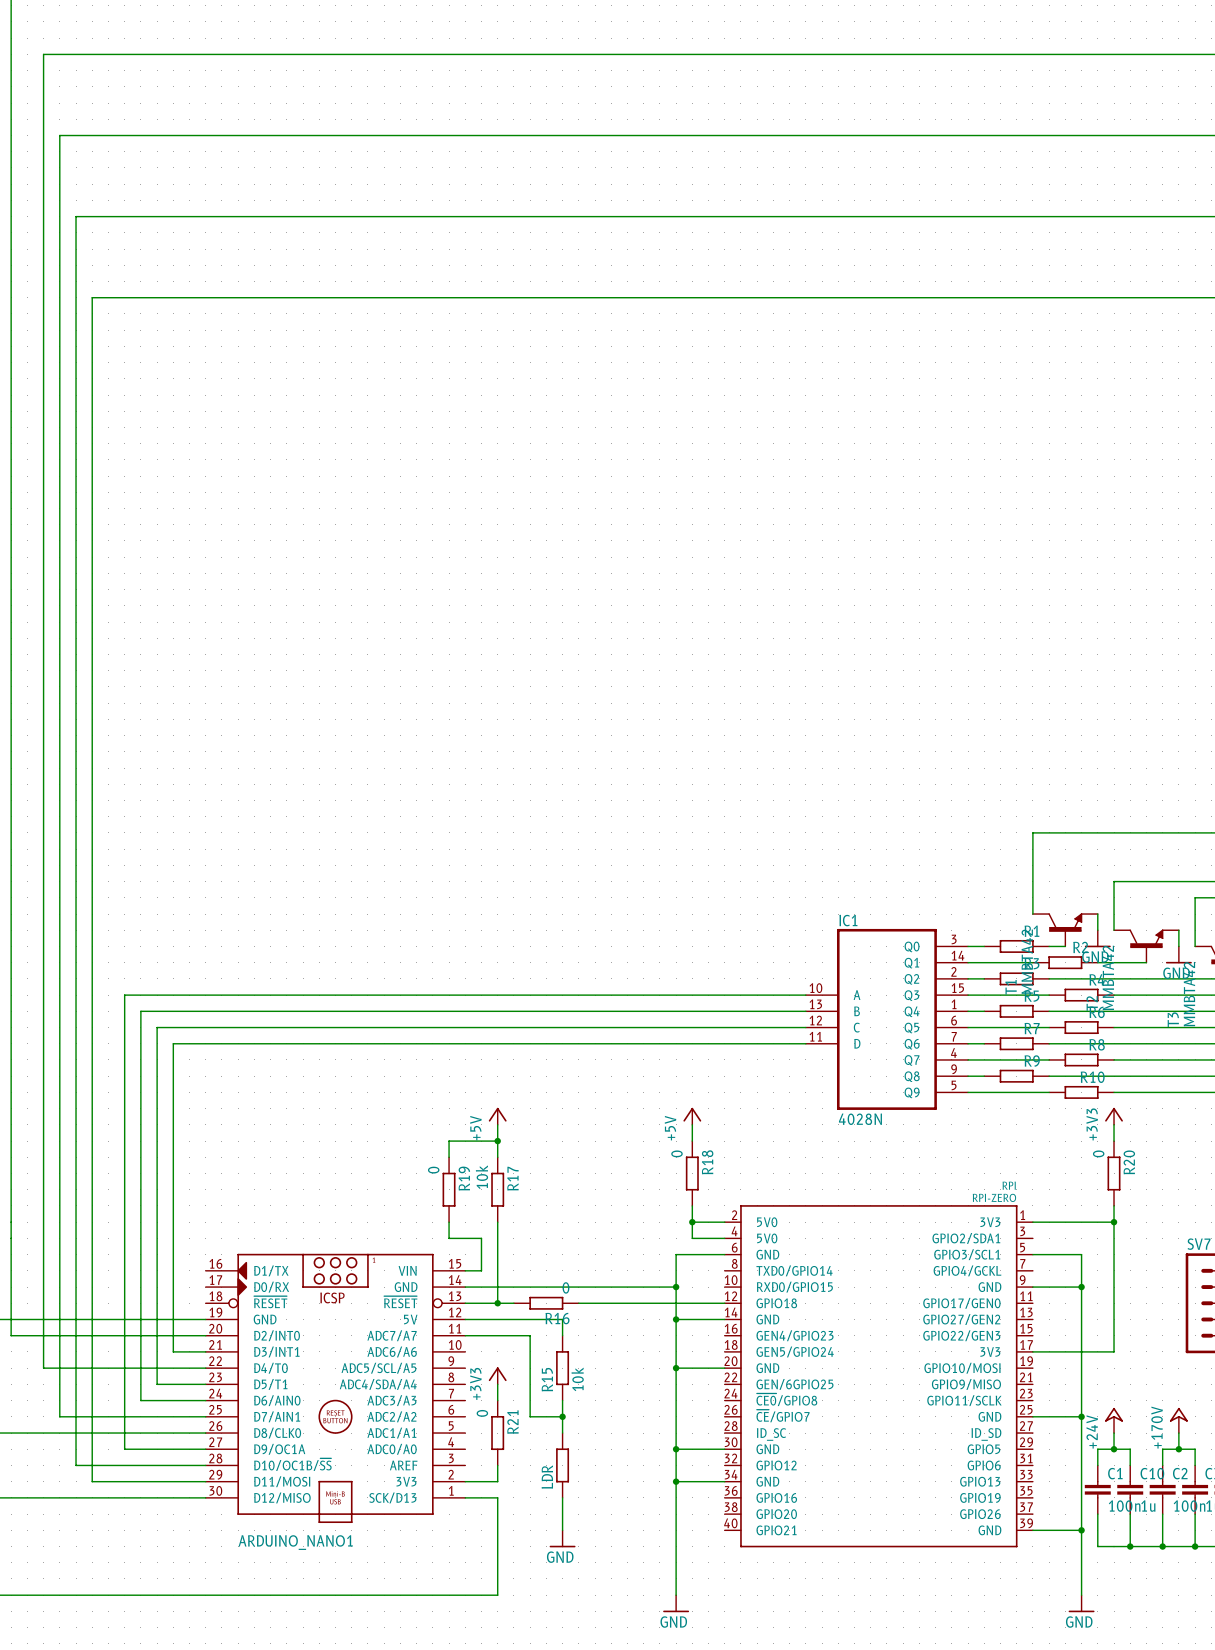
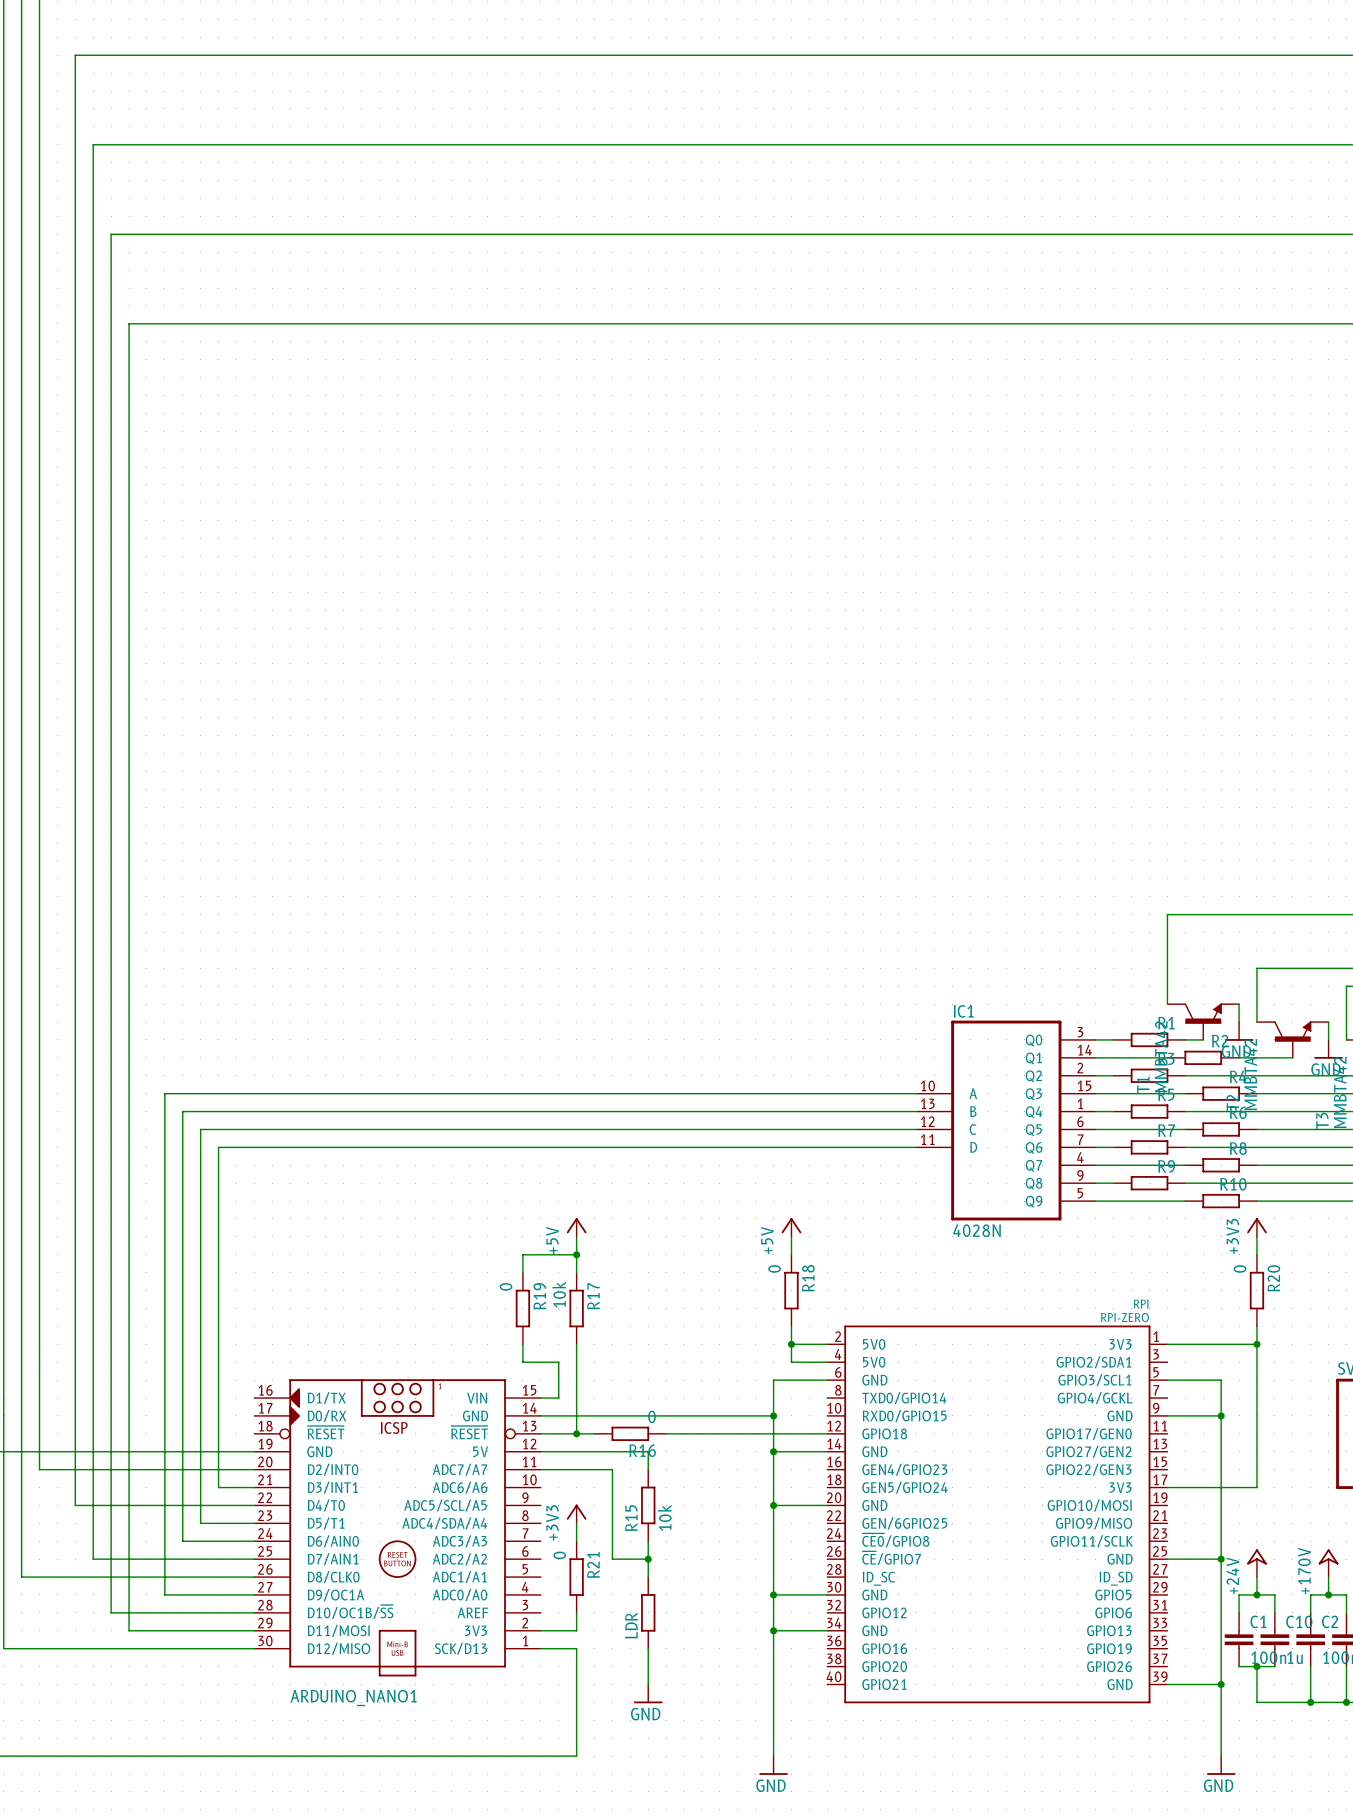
wire: (1097, 1514) (1097, 1546) (1114, 1546) -> (1256, 1666) (1256, 1702)
wire: (1130, 1514) (1130, 1546) -> (1274, 1666) (1239, 1666)
junction position: (1130, 1546) -> (1256, 1666)

